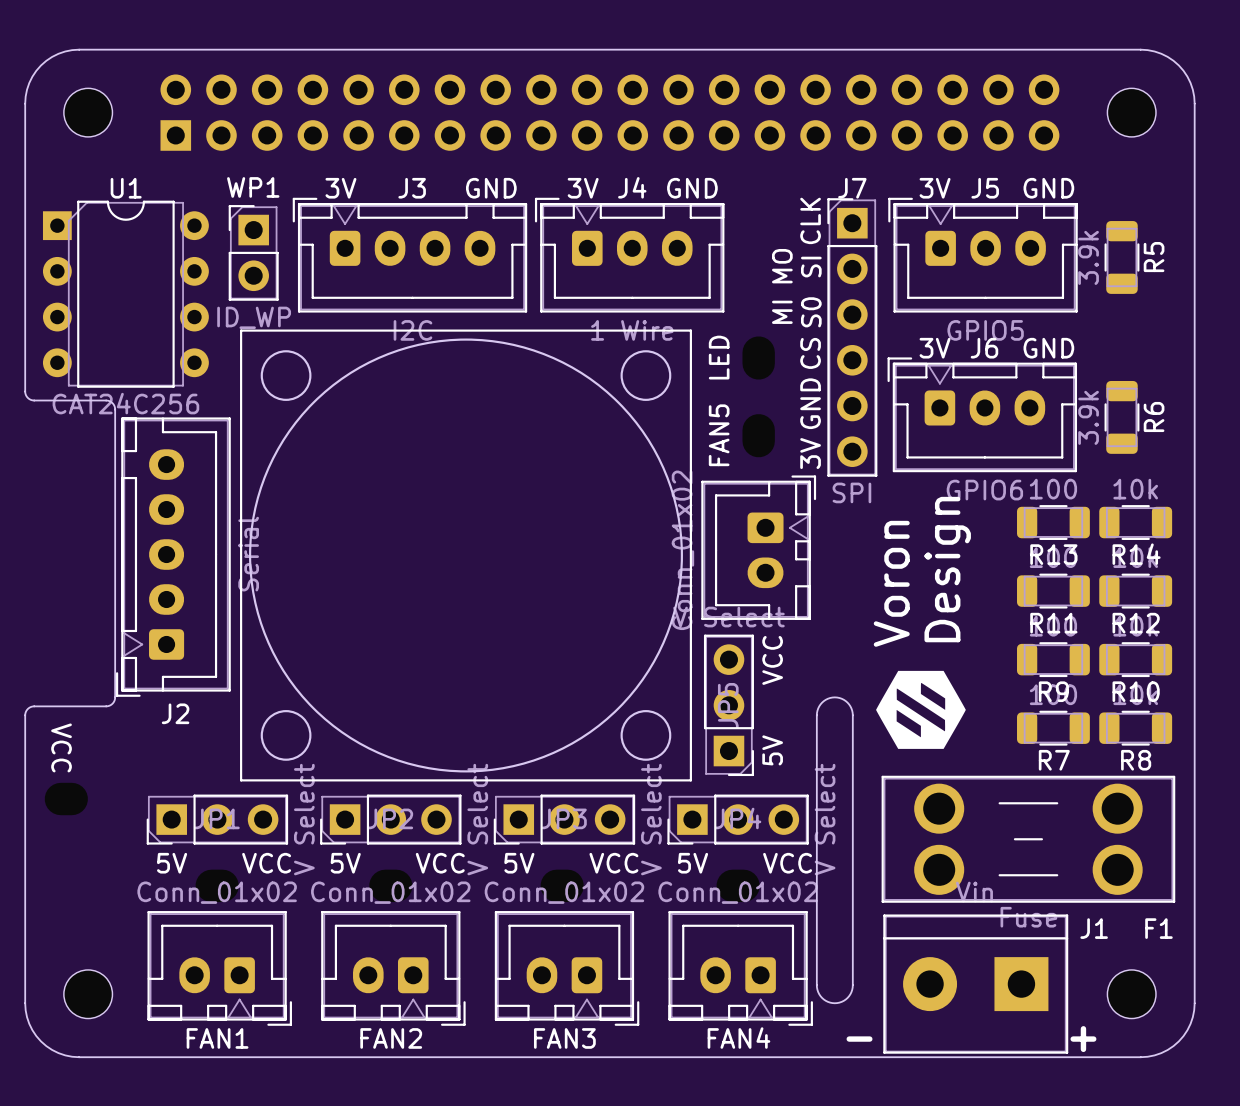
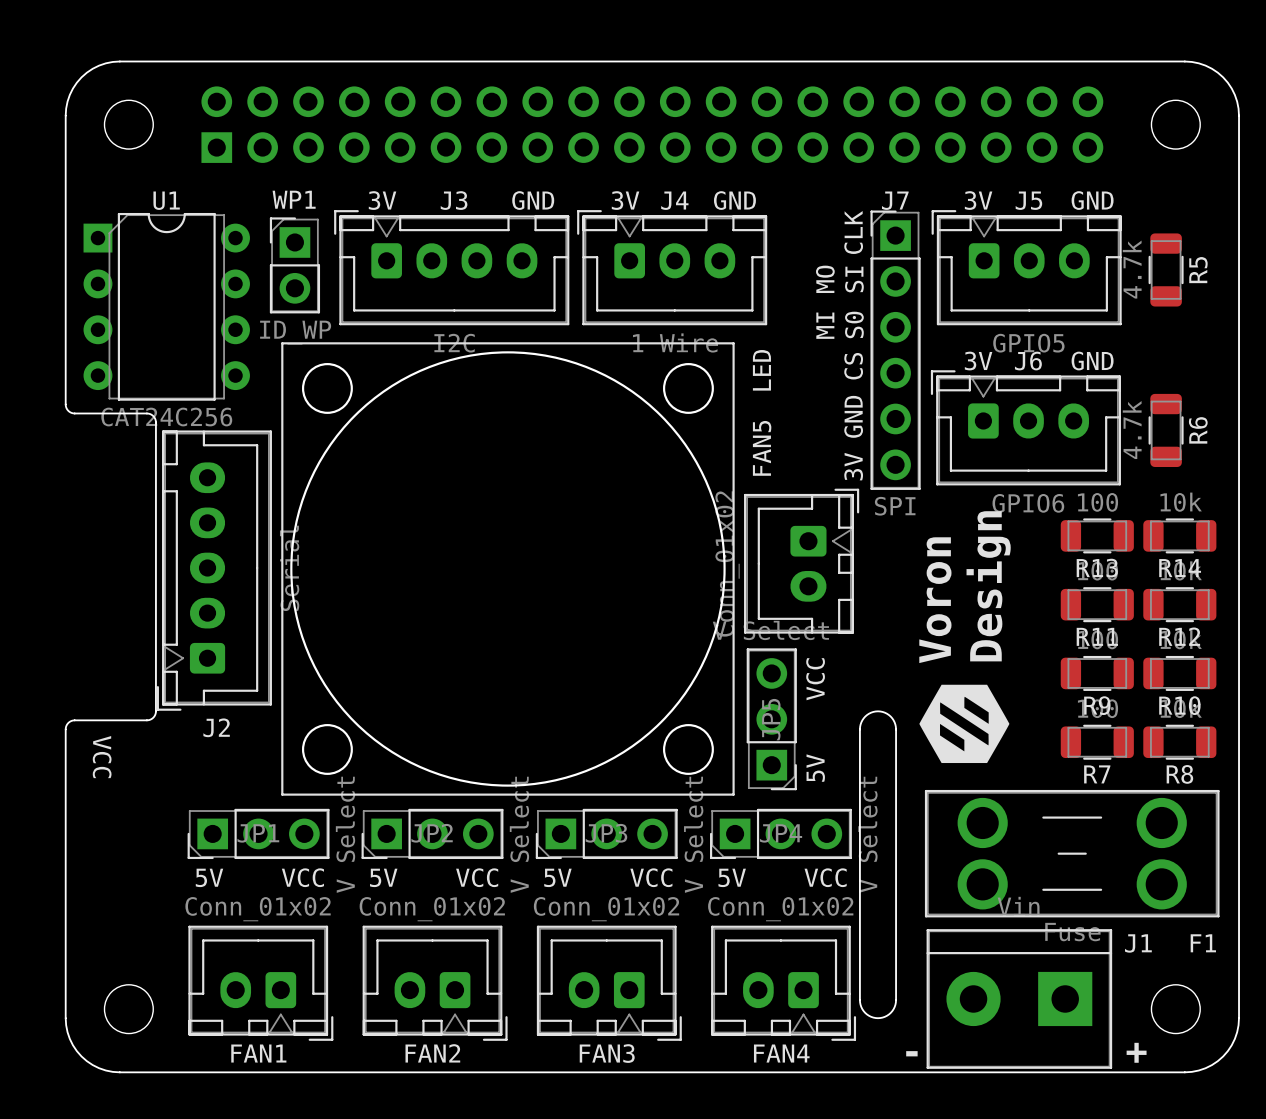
R5 value: 3.9k (1088, 257) -> 4.7k (1132, 269)
R6 value: 3.9k (1088, 417) -> 4.7k (1132, 430)

